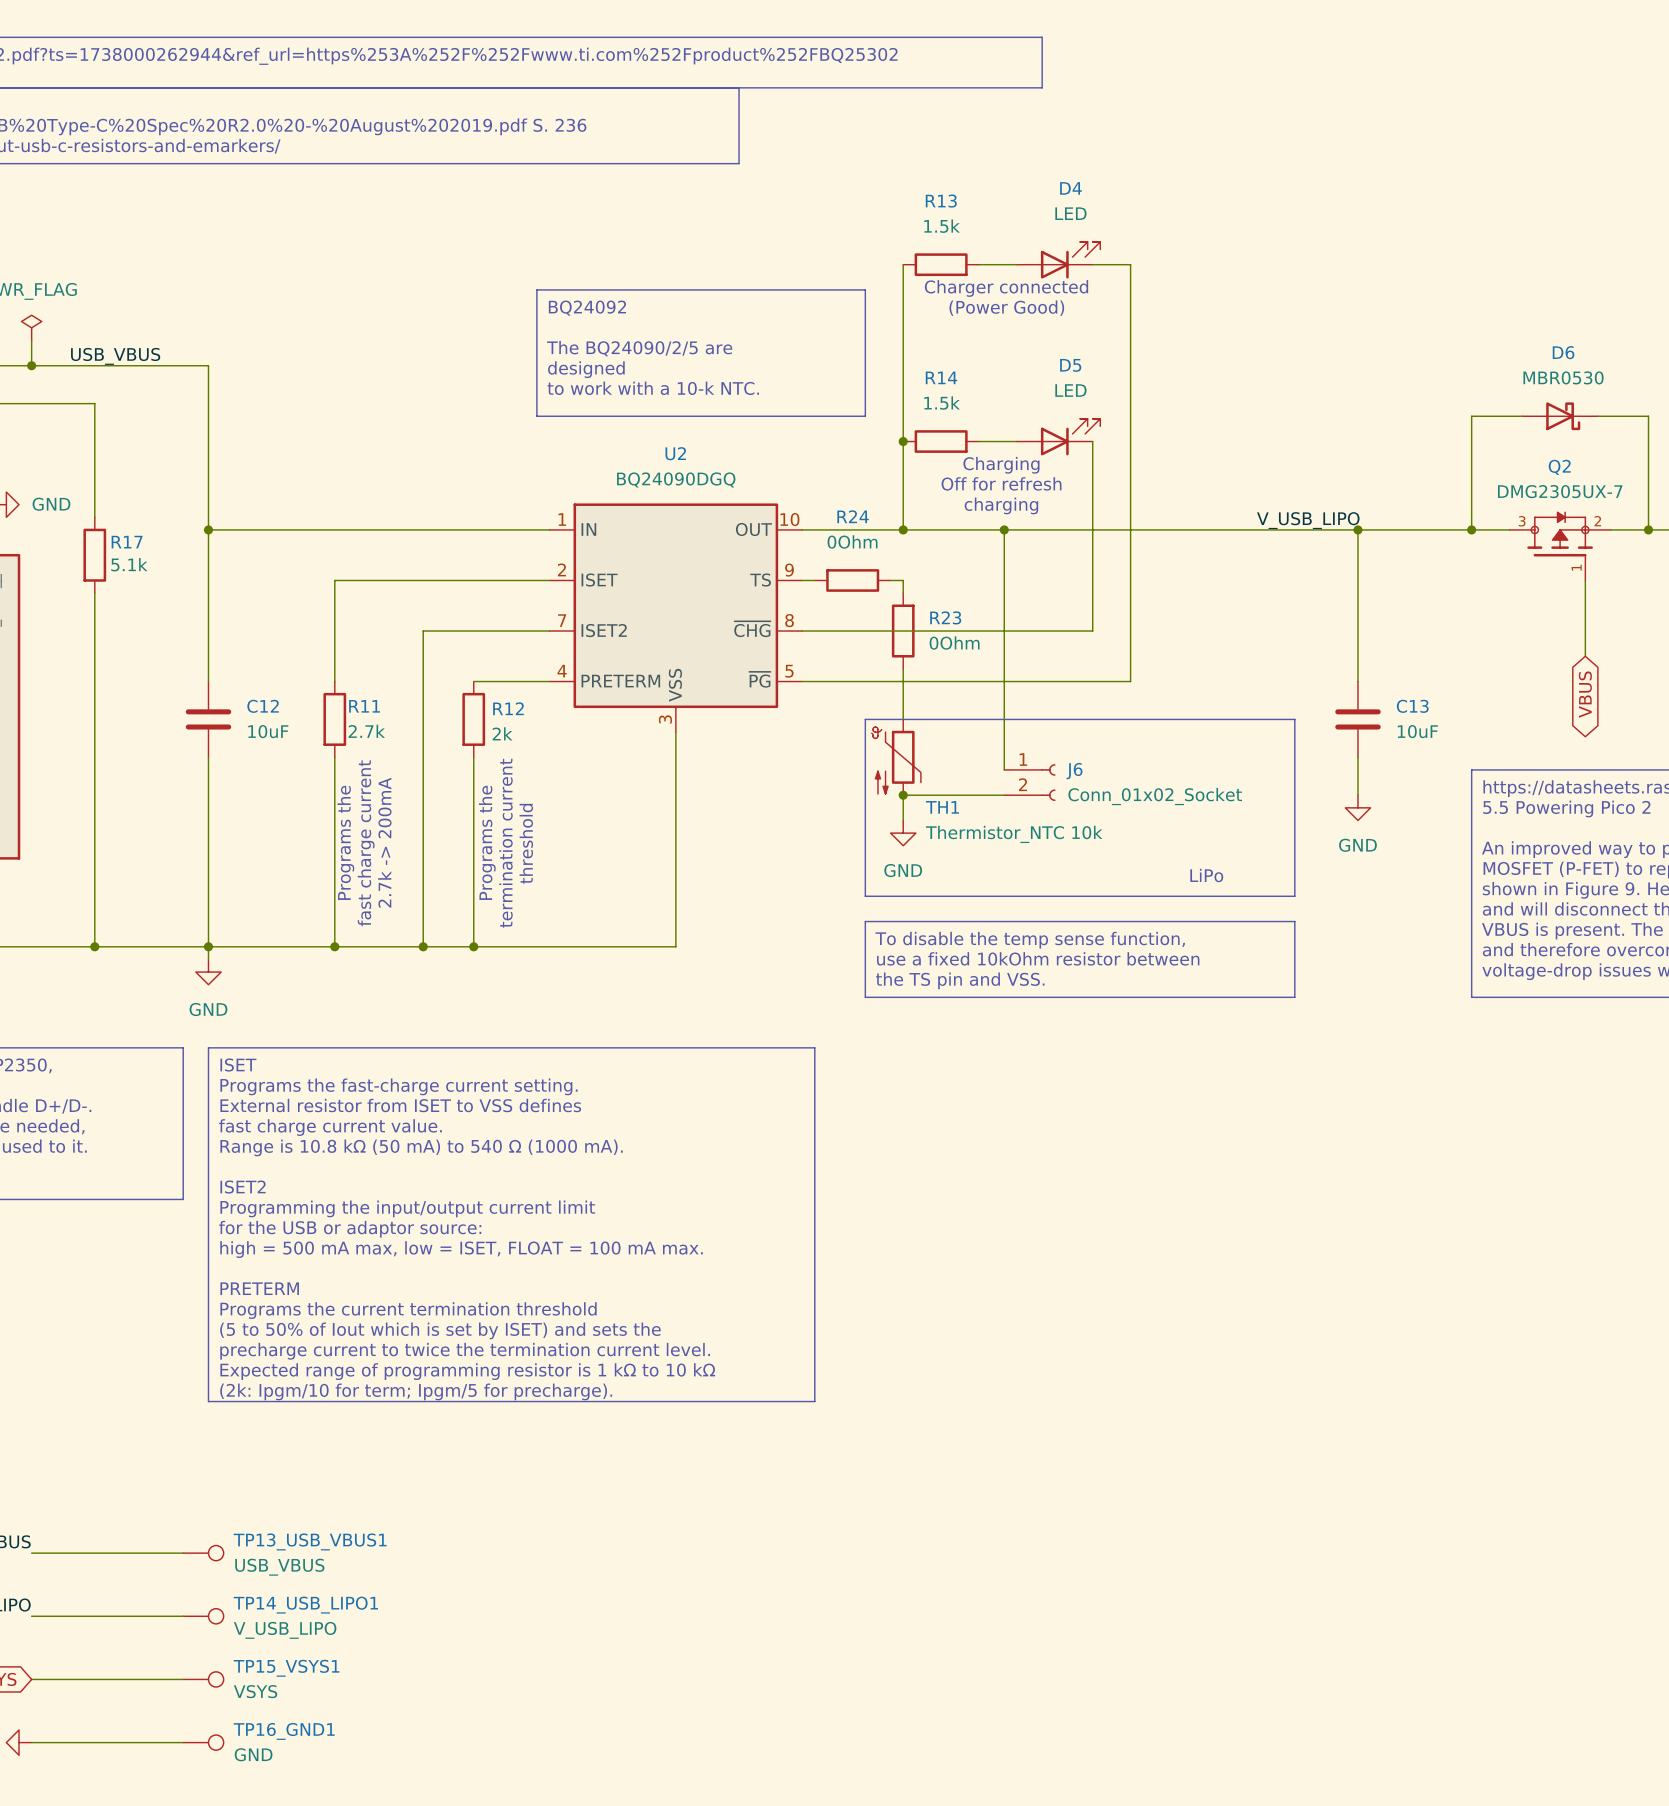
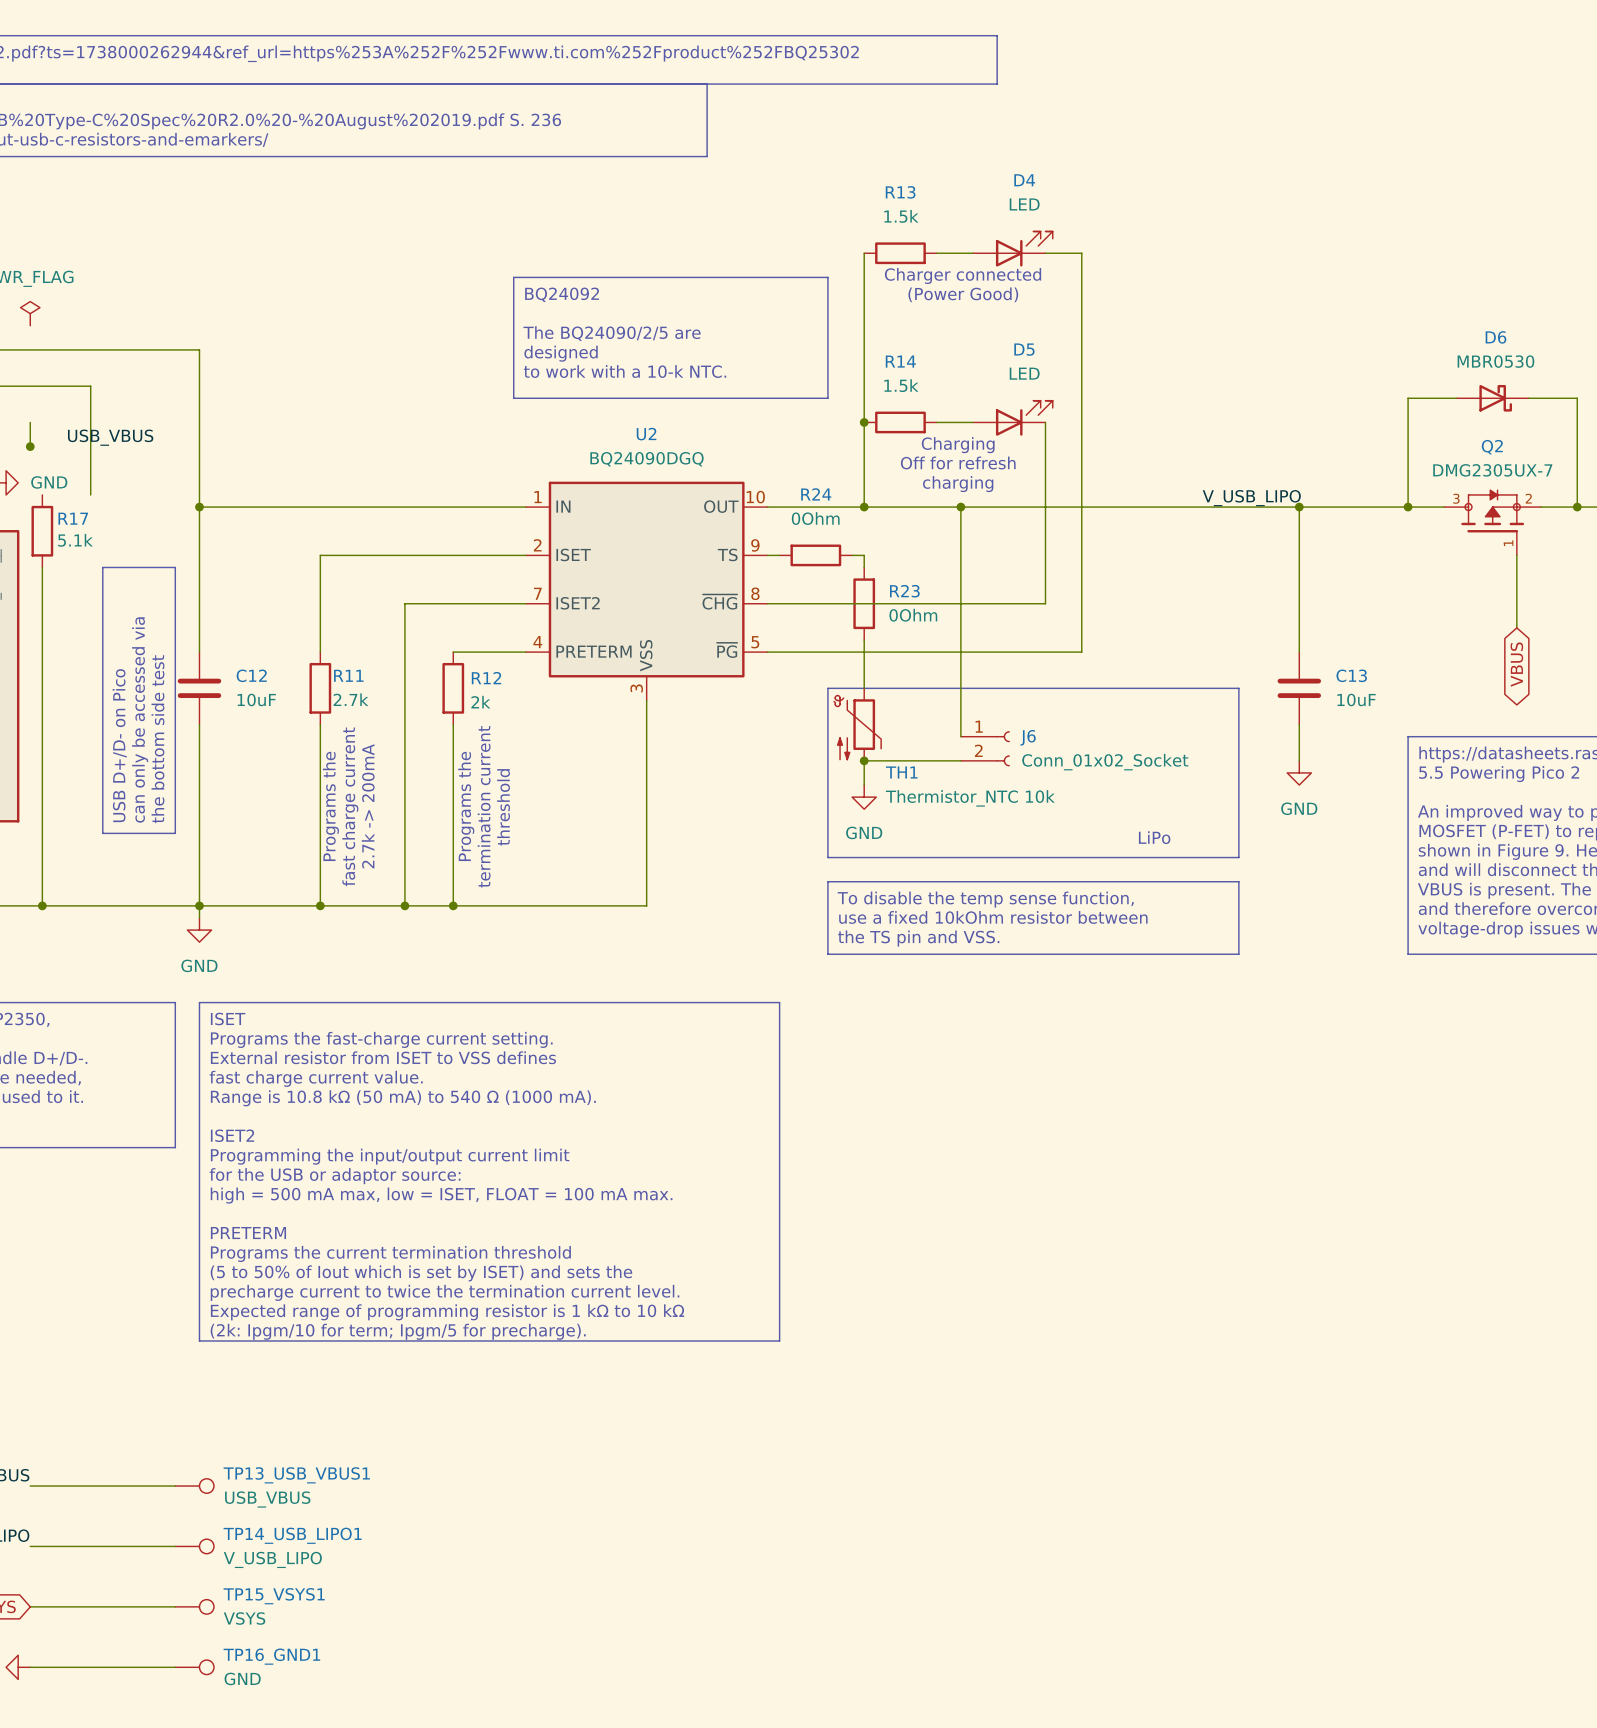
wire: (31, 340) (31, 365) -> (30, 422) (30, 446)
label position: USB_VBUS (115, 356) -> USB_VBUS (110, 437)
junction: (31, 365) -> none
junction: none -> (30, 446)
R17 position: (94, 555) -> (42, 531)
wire: (94, 593) (94, 946) -> (42, 567) (42, 905)
line: none -> (102, 567) (175, 567) (175, 833) (102, 833) (102, 567)
text: none -> can only be accessed via (140, 719)
text: none -> the bottom side test (157, 739)
text: none -> USB D+/D- on Pico (119, 745)
junction position: (94, 946) -> (42, 905)

